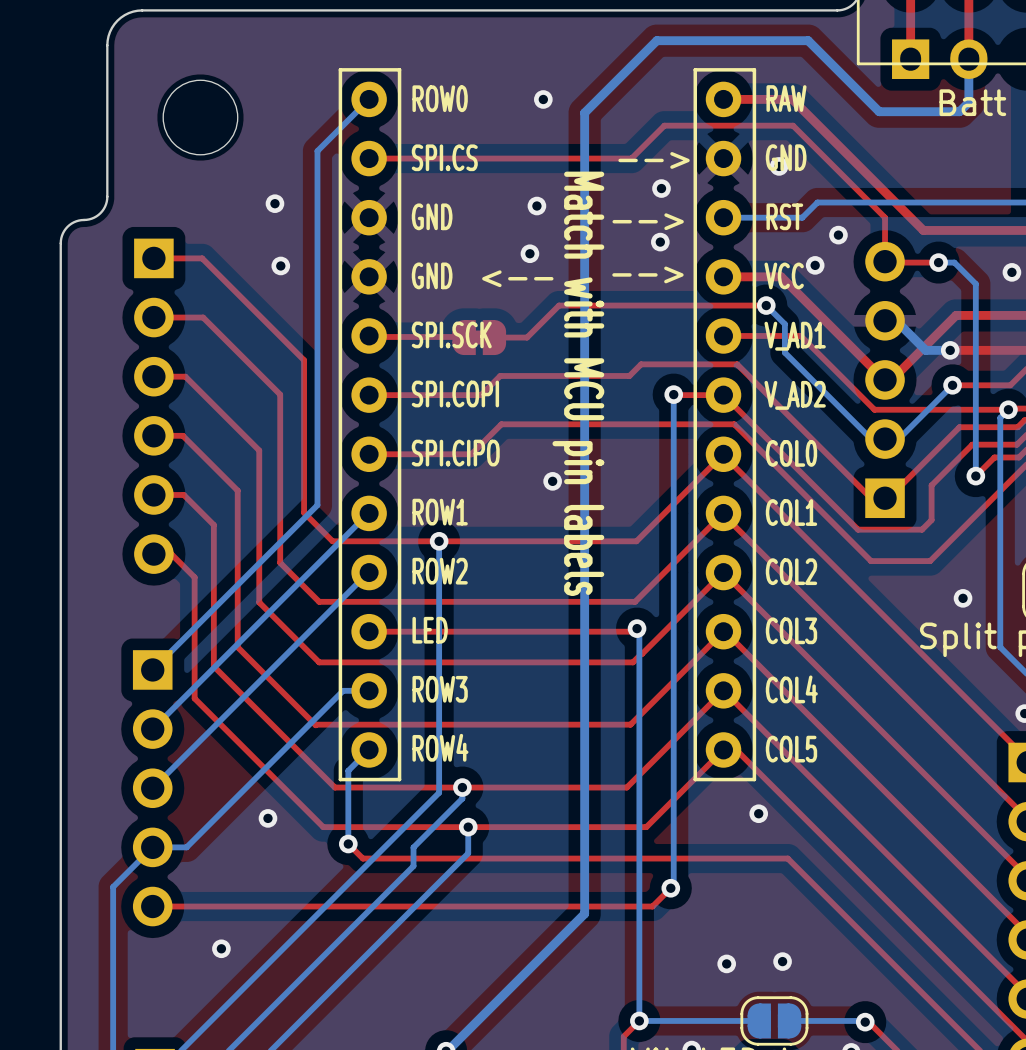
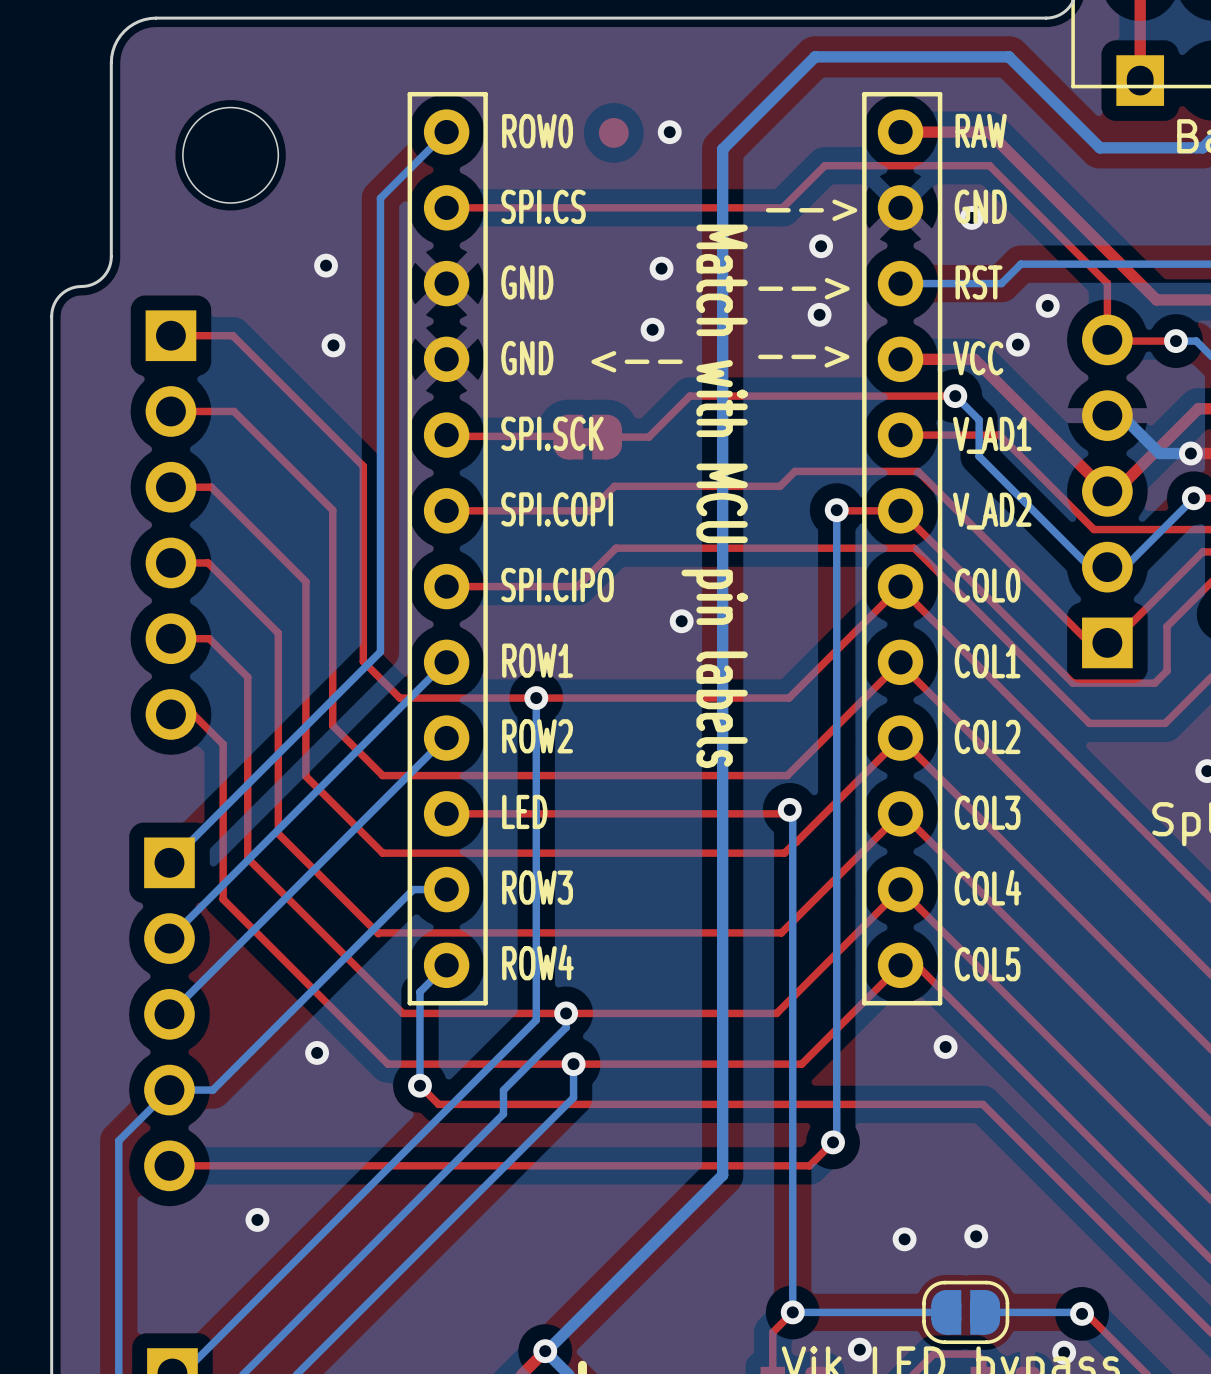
part: none -> (613, 132)

